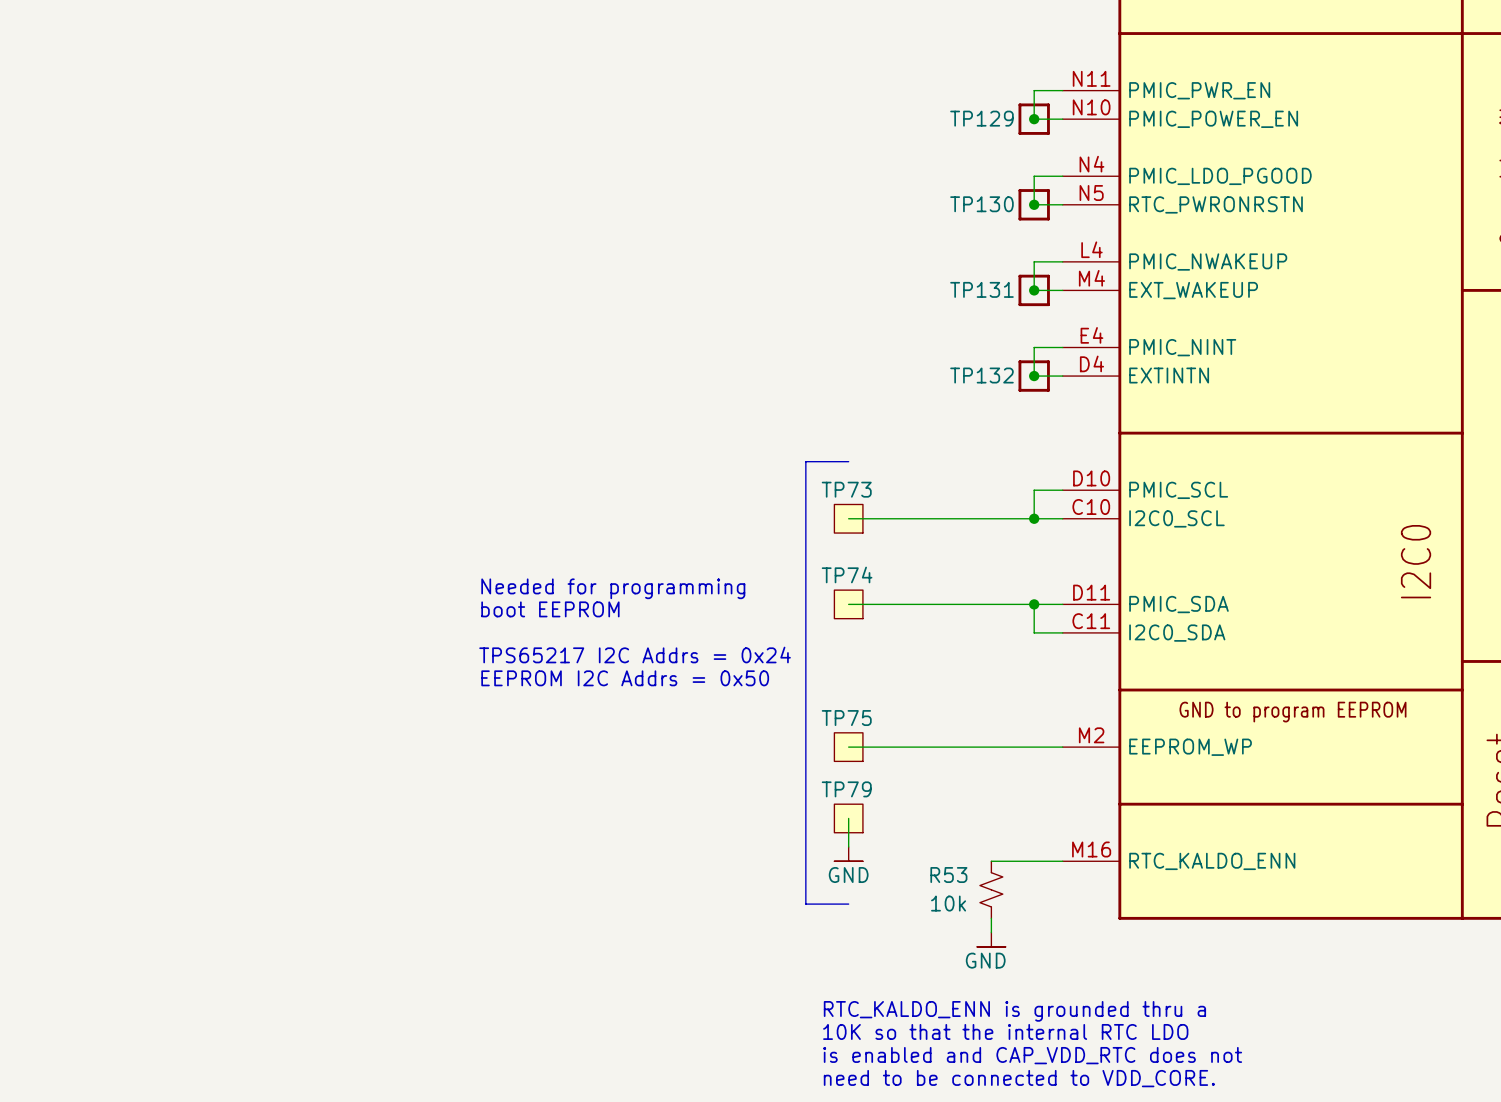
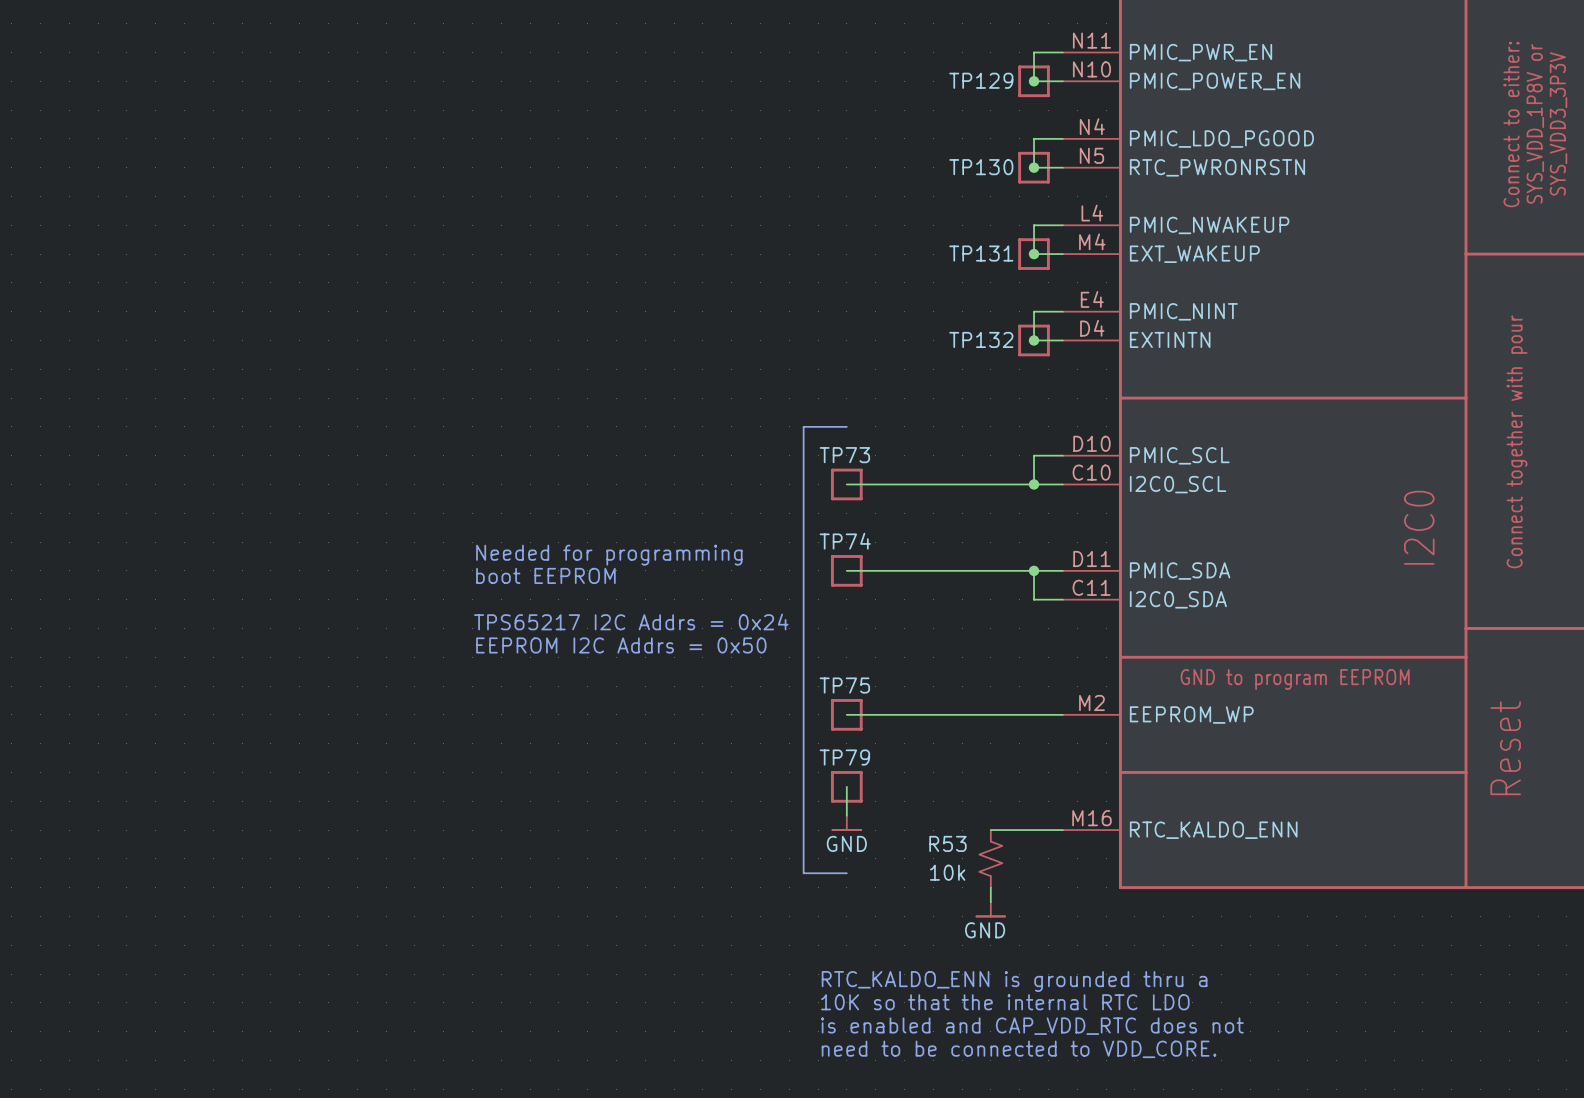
TP73 symbol: [834, 504, 863, 534] -> [830, 468, 863, 501]
TP74 symbol: [834, 590, 863, 619] -> [830, 555, 863, 587]
TP75 symbol: [834, 732, 863, 762] -> [830, 699, 863, 731]
TP79 symbol: [834, 804, 863, 833] -> [830, 771, 863, 803]

